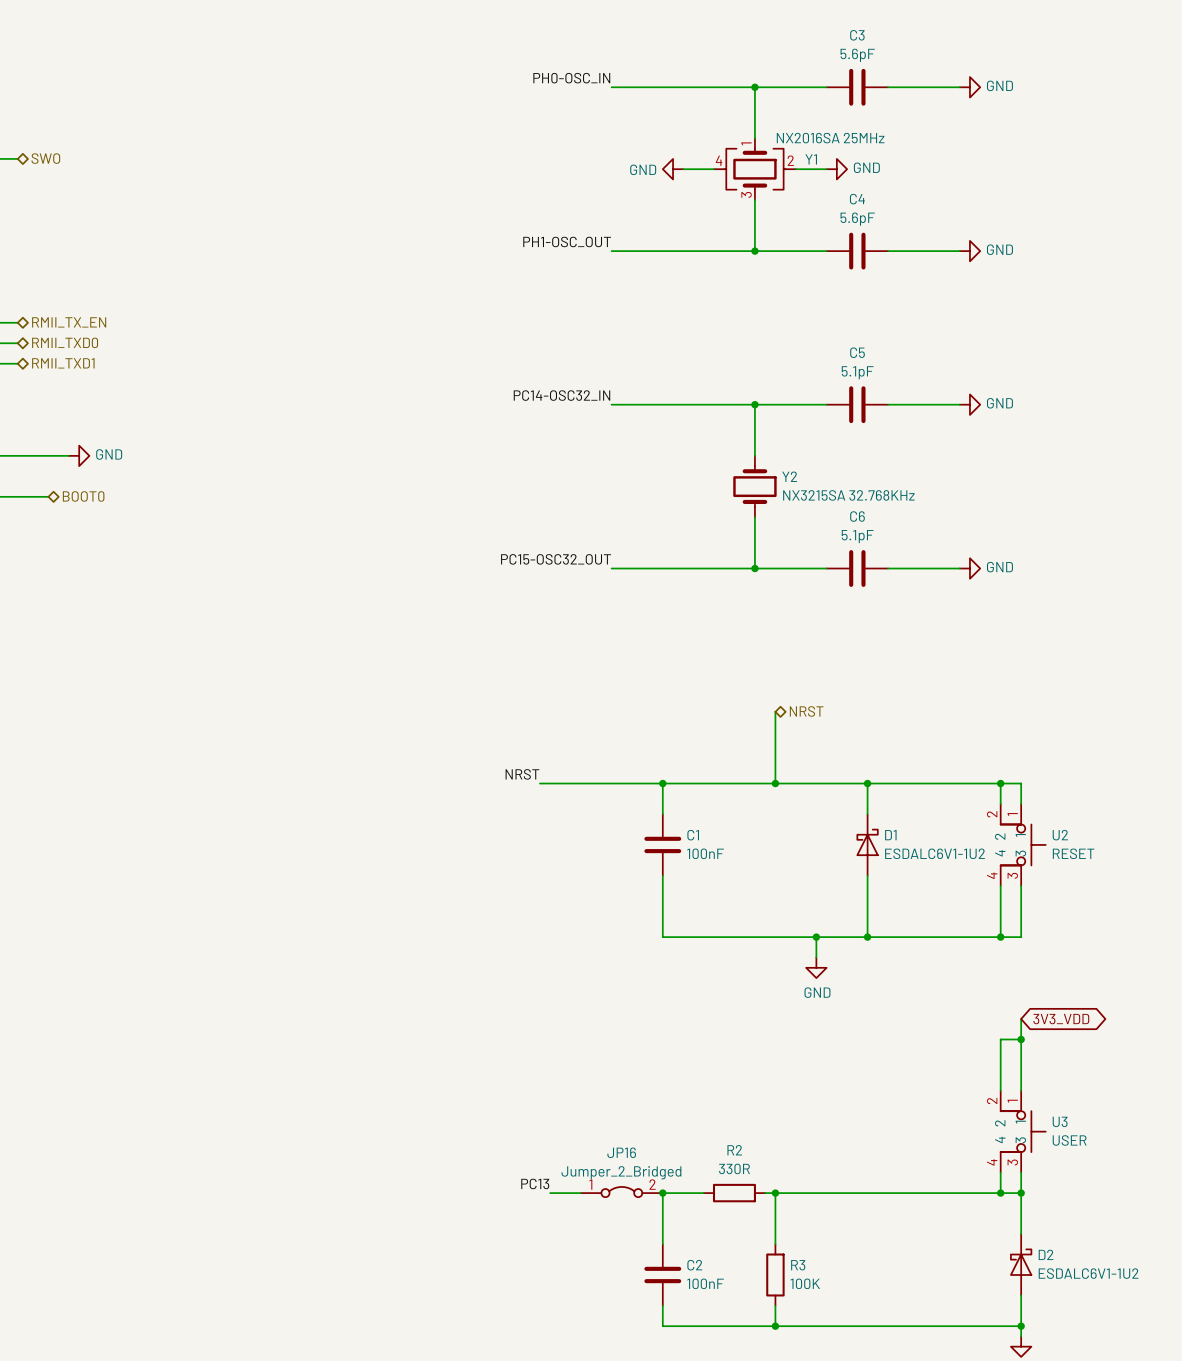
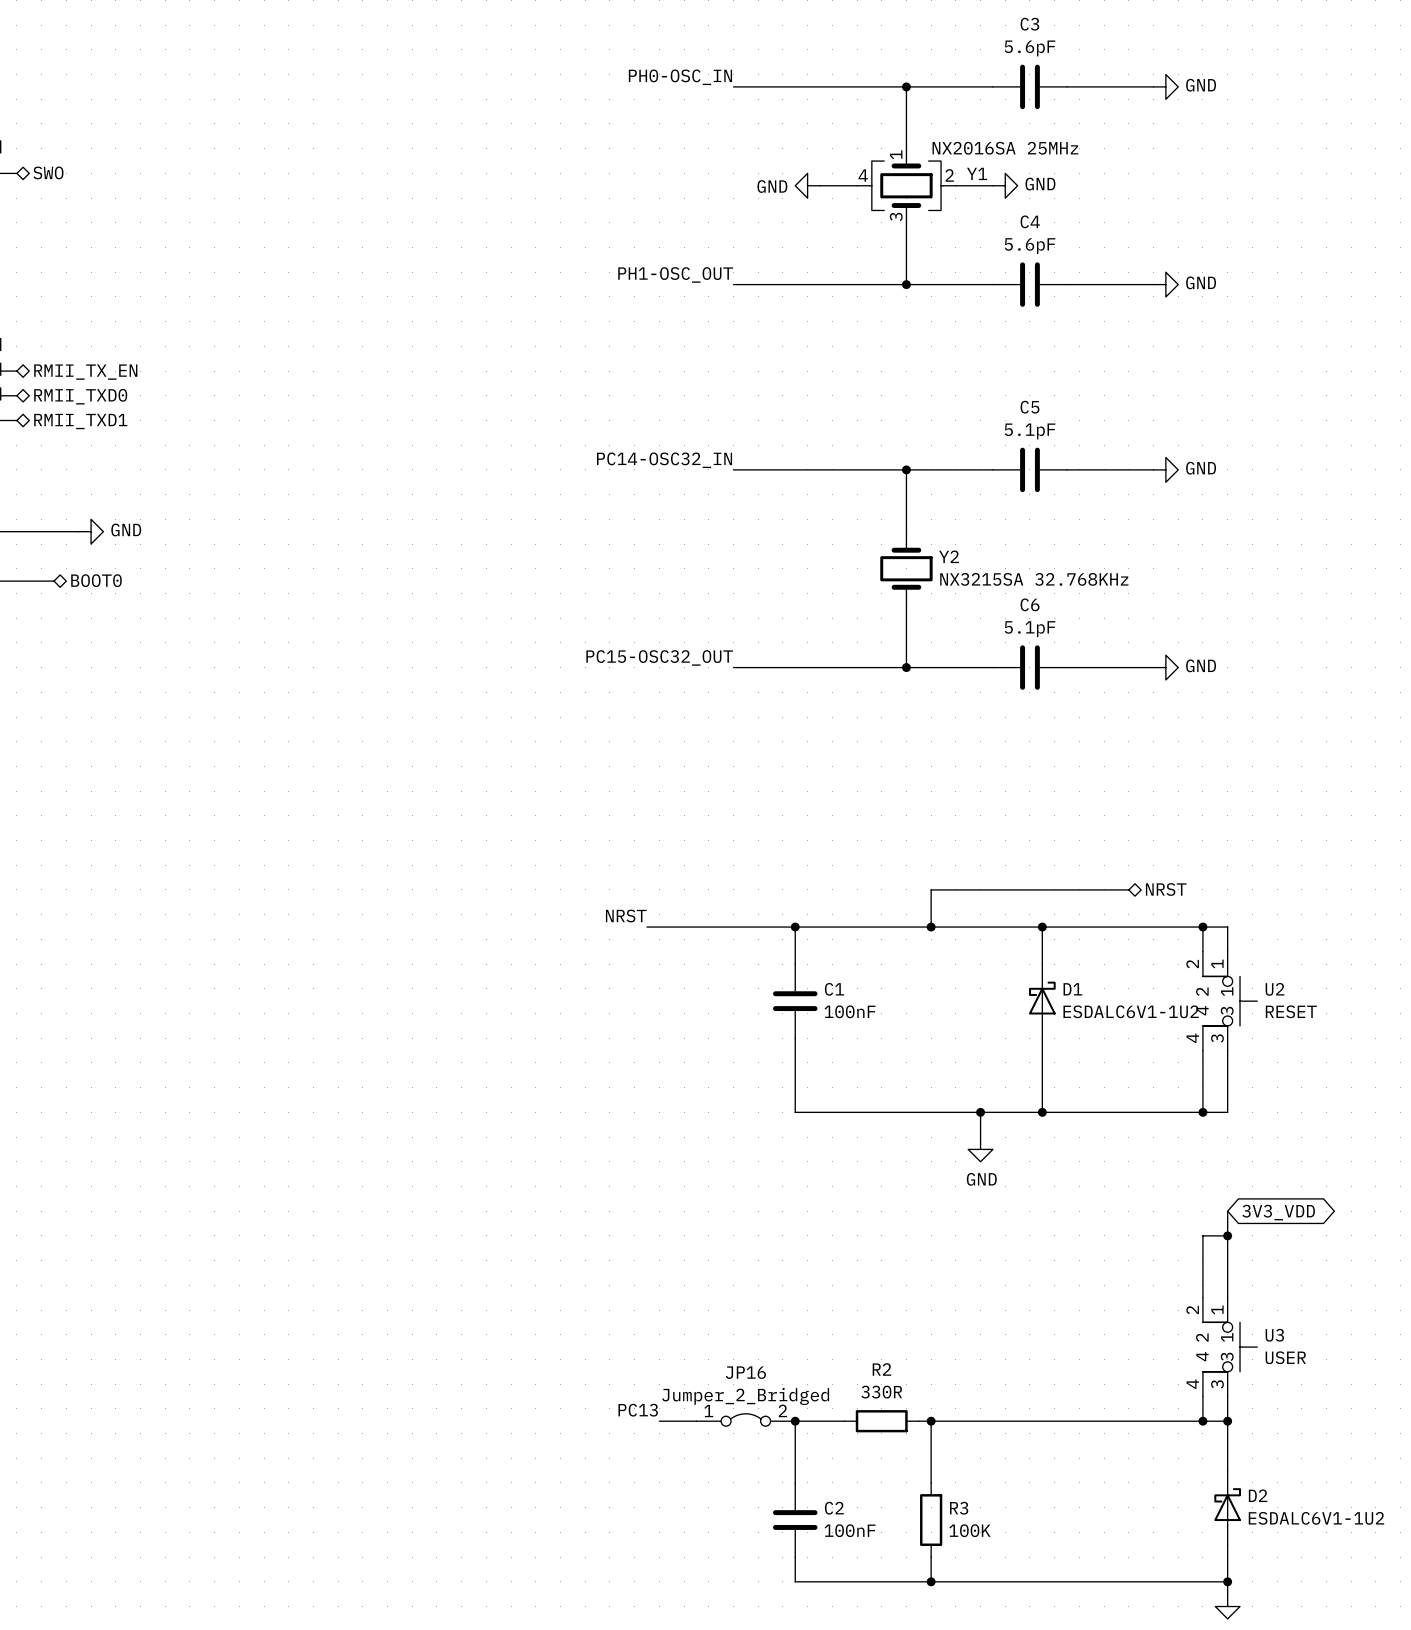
wire: (775, 711) (775, 752) -> (1128, 889) (931, 889)
hierarchical label position: NRST (806, 711) -> NRST (1166, 889)

